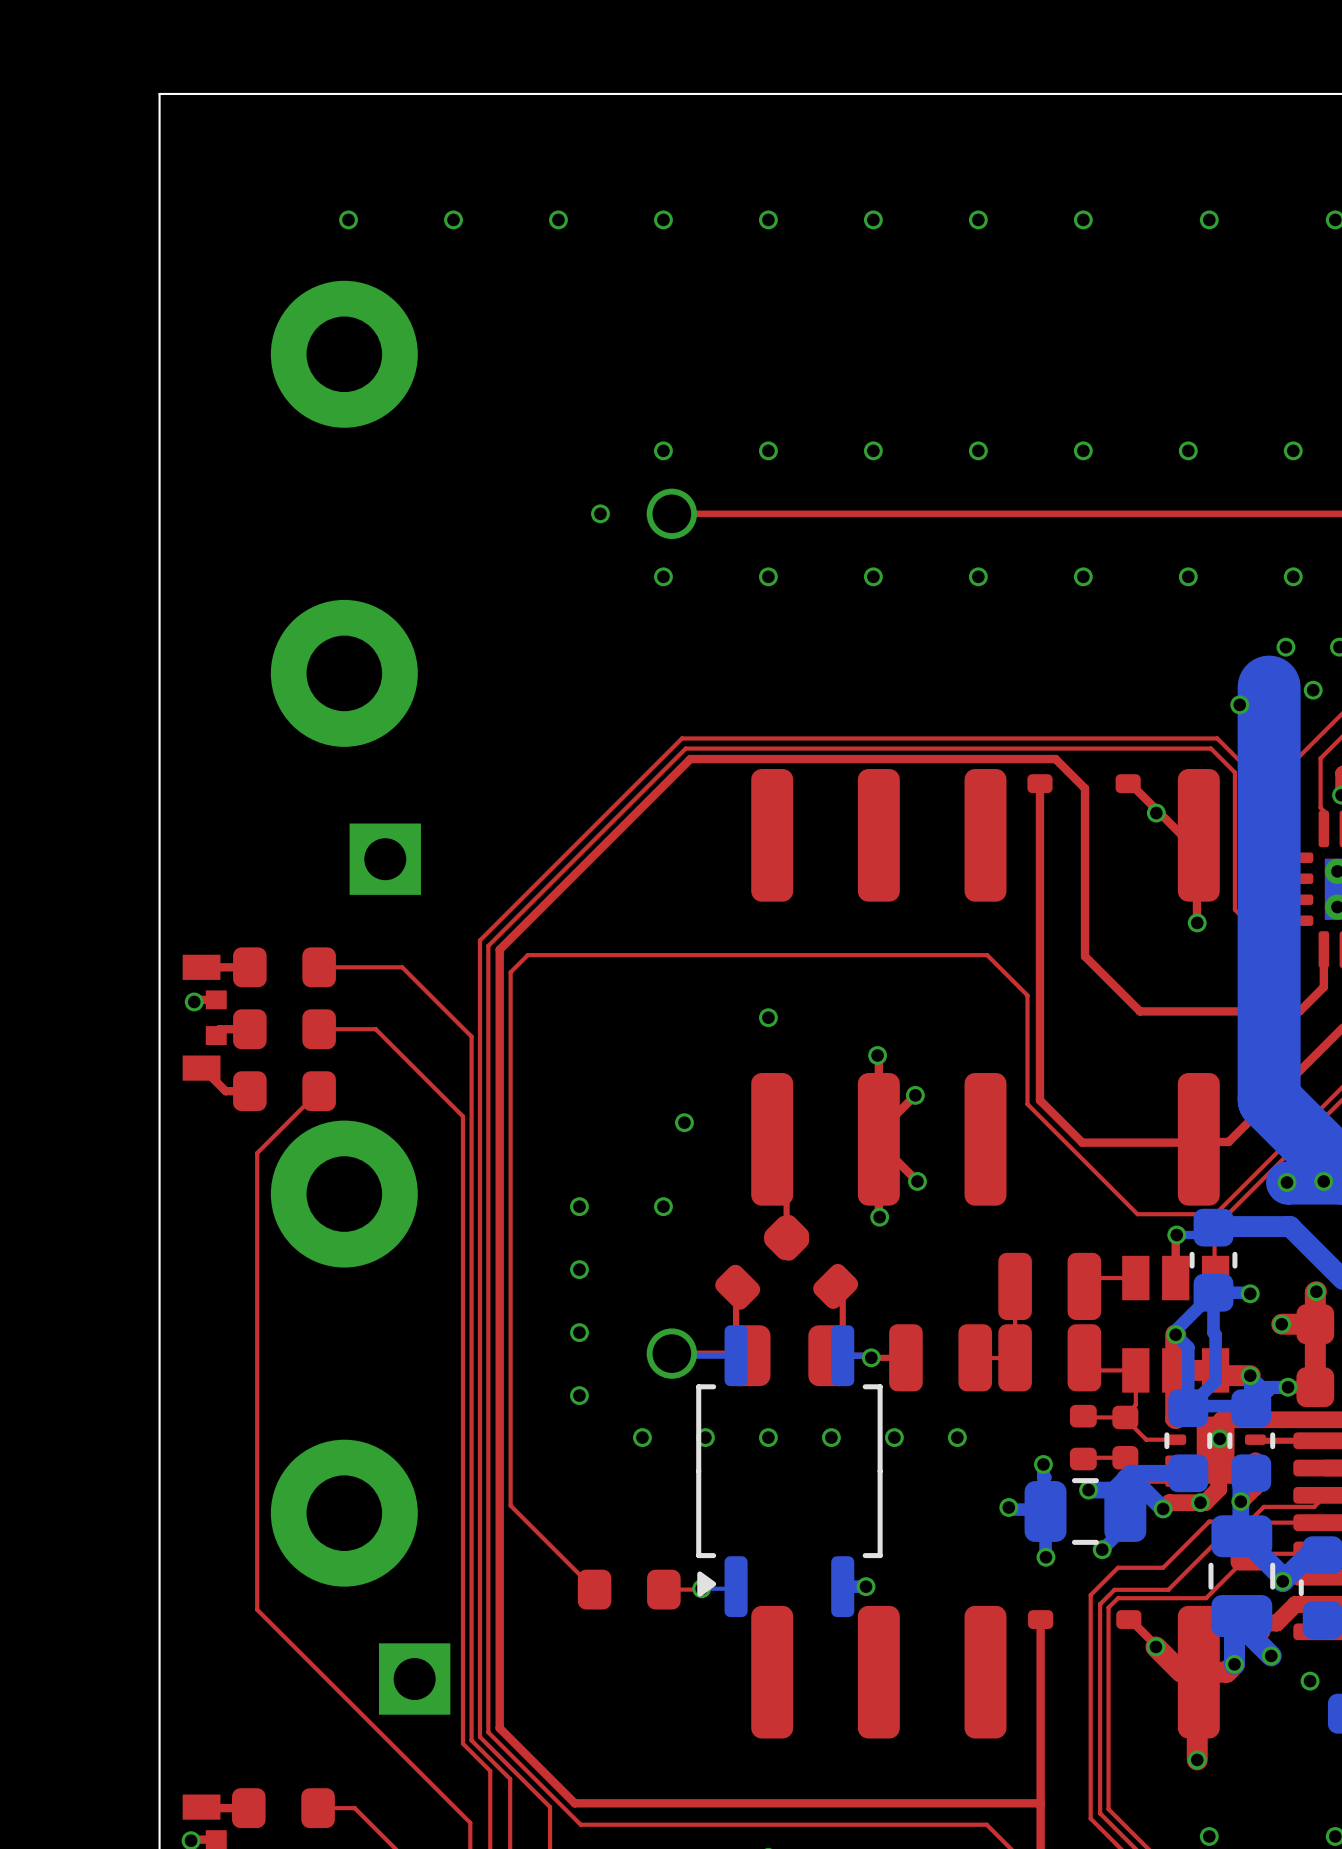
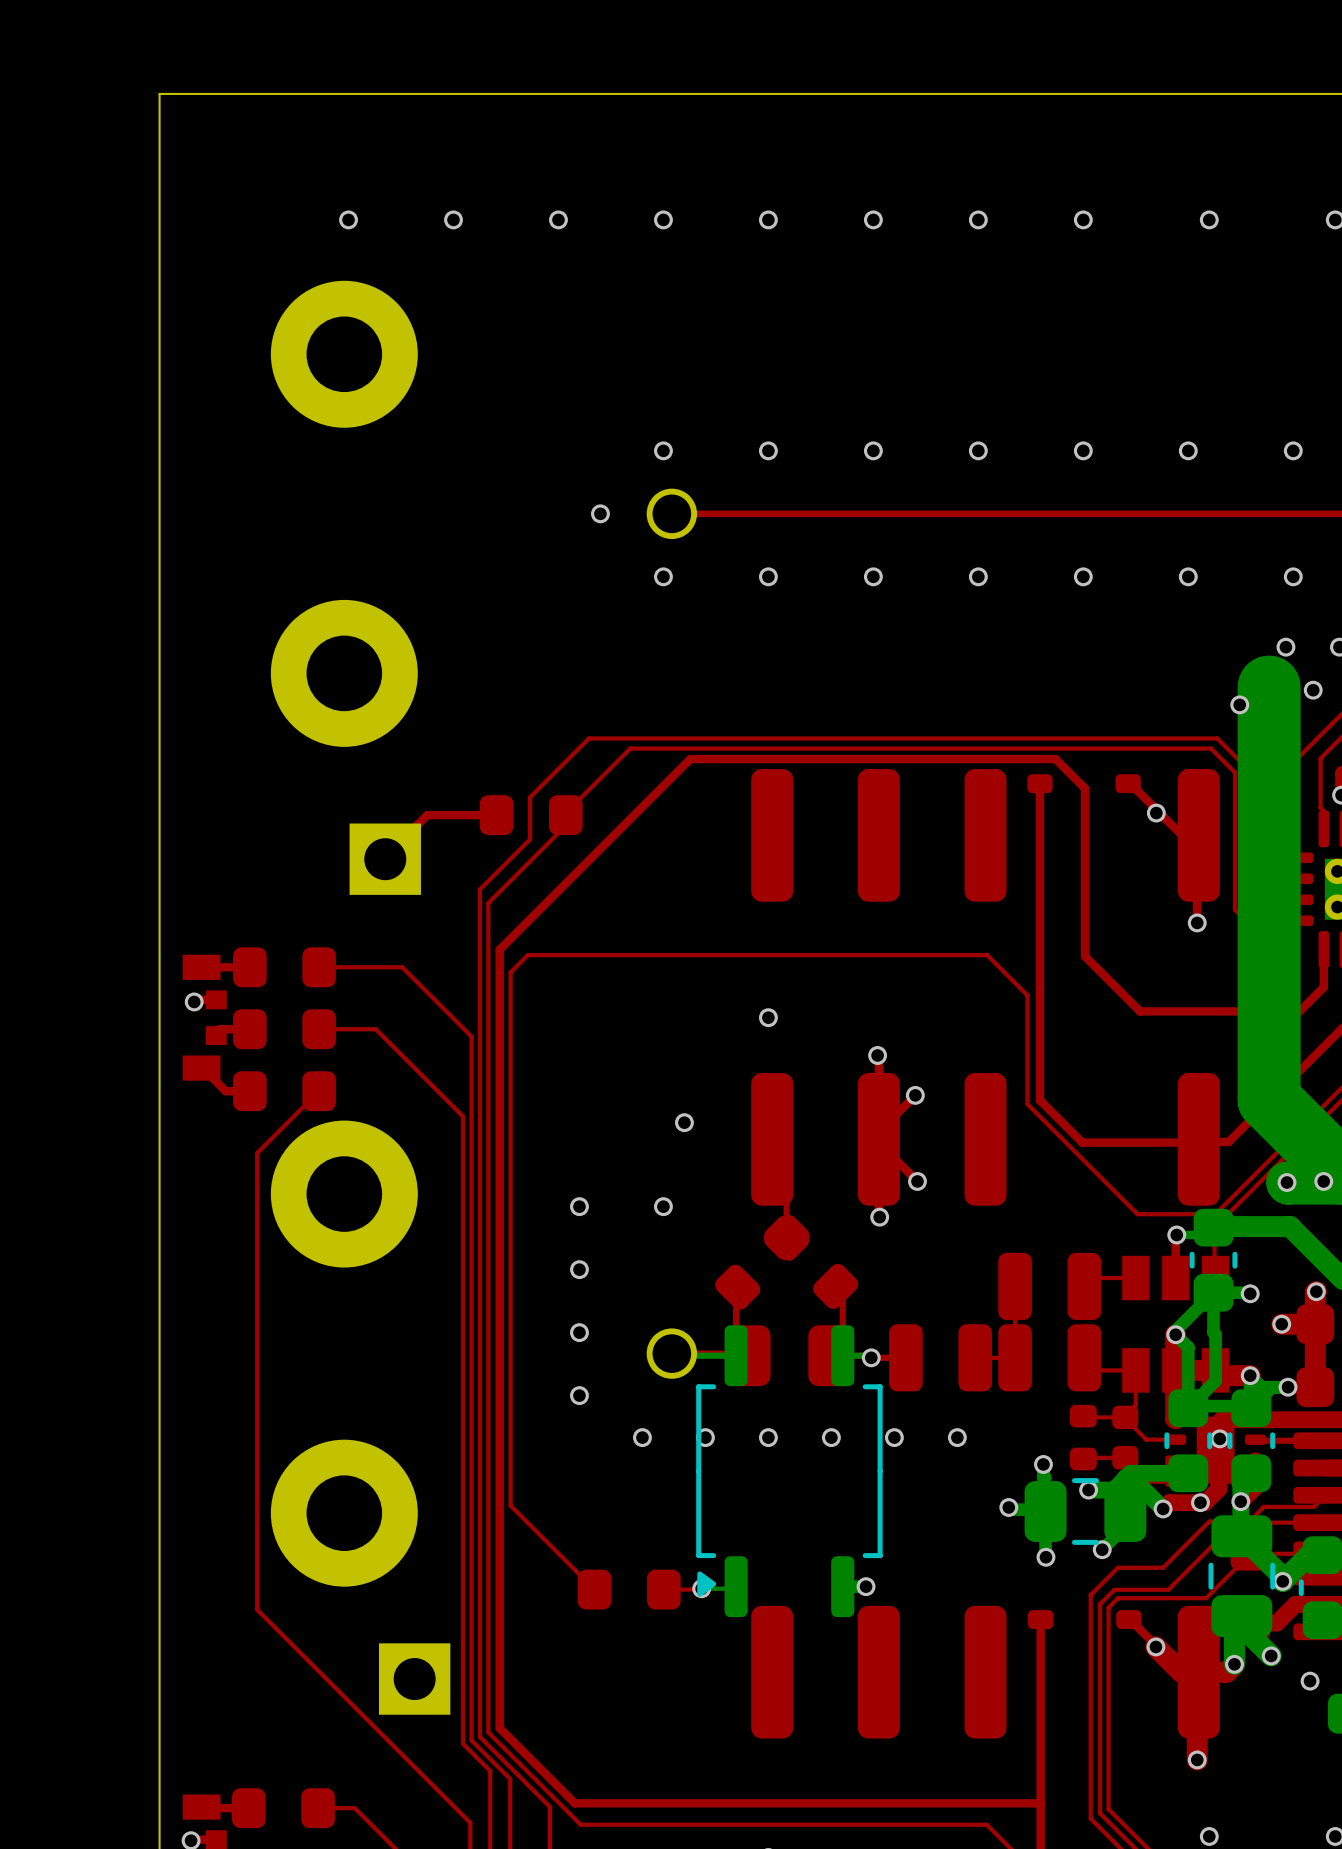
top track: (681, 738) (479, 940) -> (681, 738) (588, 738) (530, 797) (530, 839) (479, 889) (479, 940)
top track: (685, 748) (488, 945) -> (685, 748) (630, 748) (563, 815) (563, 827) (488, 903) (488, 945)
top track: none -> (496, 815) (427, 815) (381, 861)
part: none -> (531, 815)

